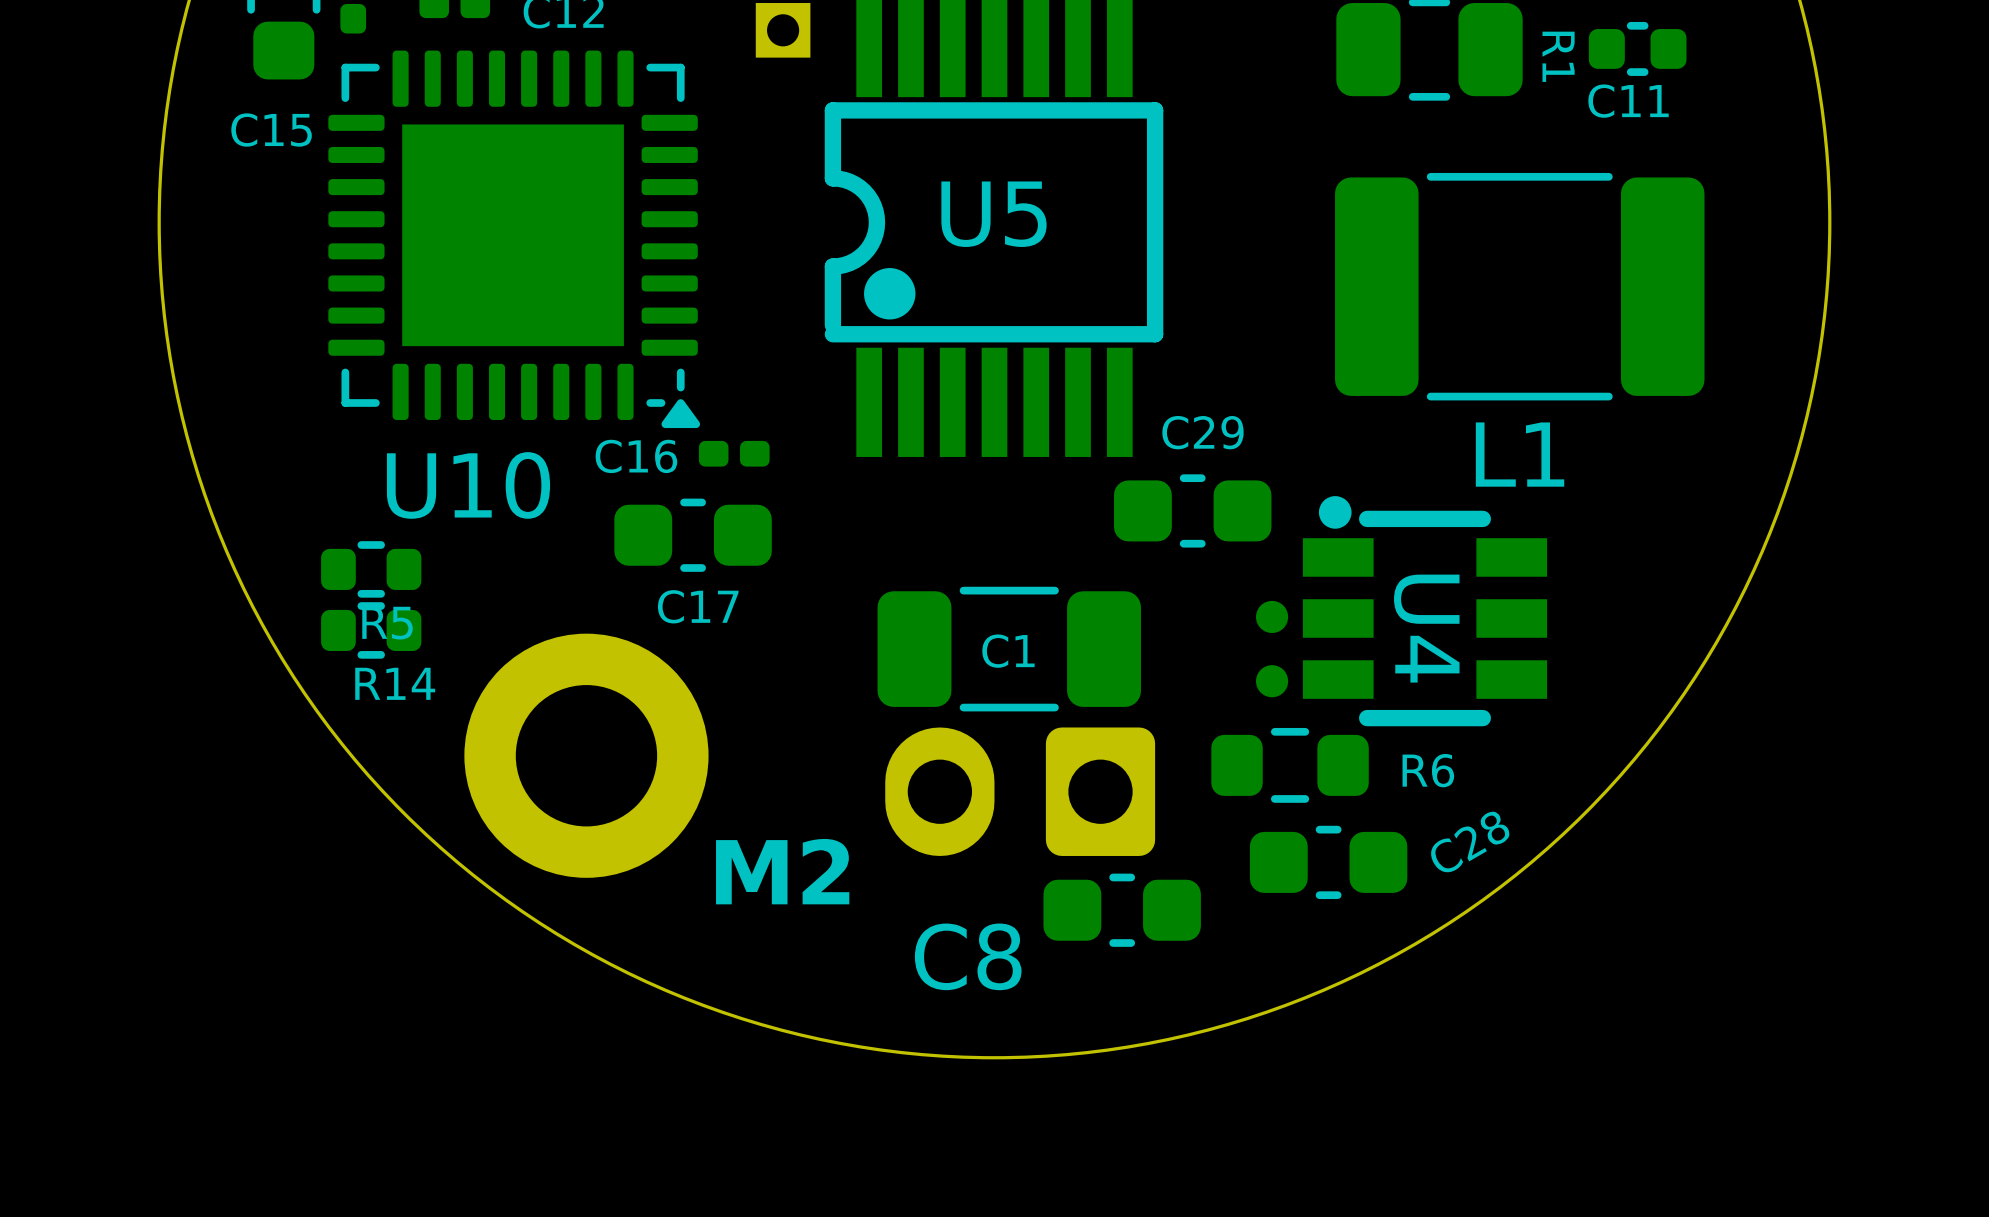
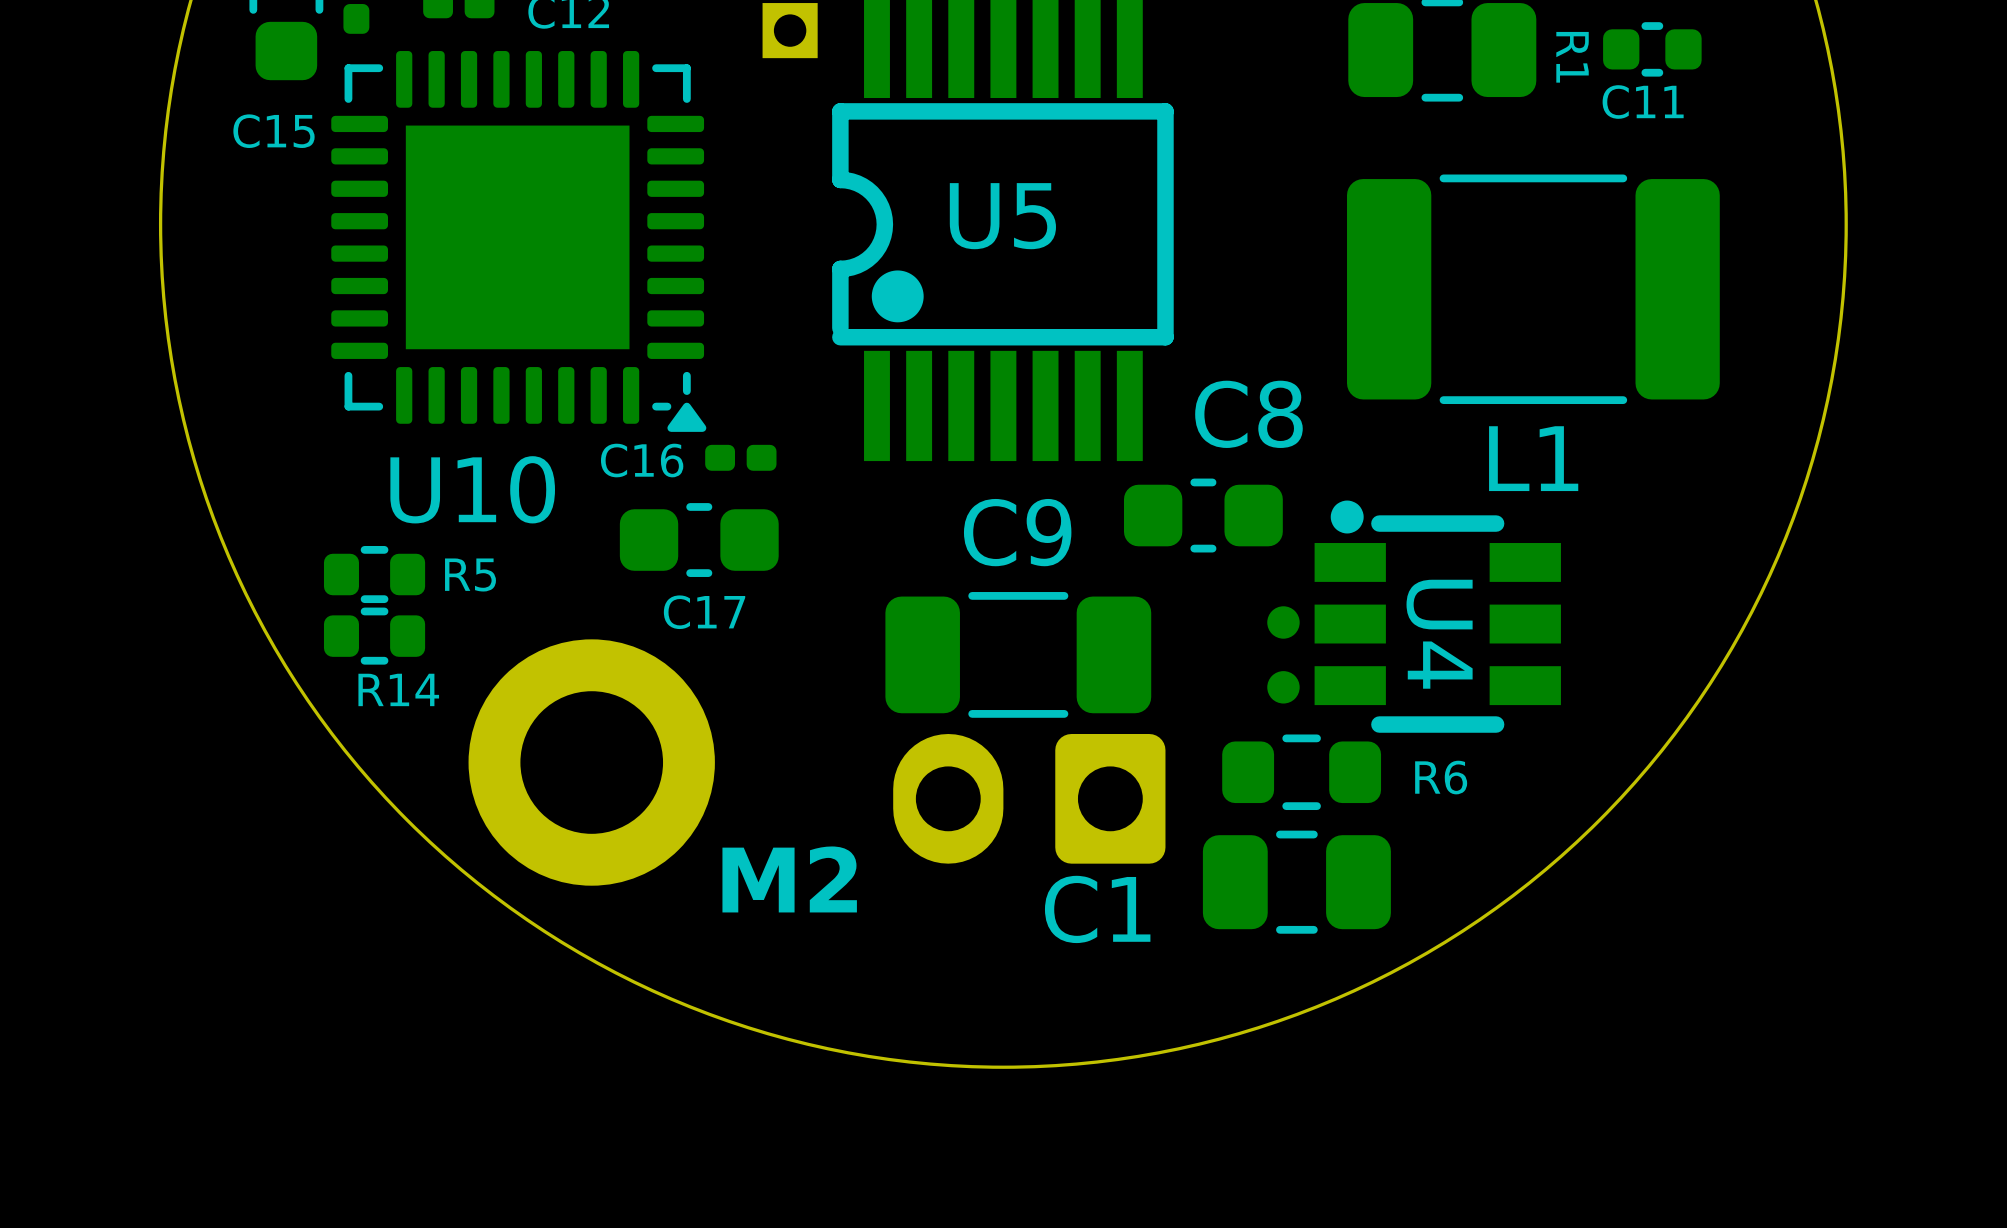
C29 name: C29 (1203, 432) -> C8 (1248, 414)
R5 name position: R5 (387, 623) -> R5 (470, 574)
C1 name: C1 (1008, 651) -> C9 (1017, 532)
C28: (1328, 862) -> none
C1: none -> (1296, 882)
C8: (1122, 910) -> none

